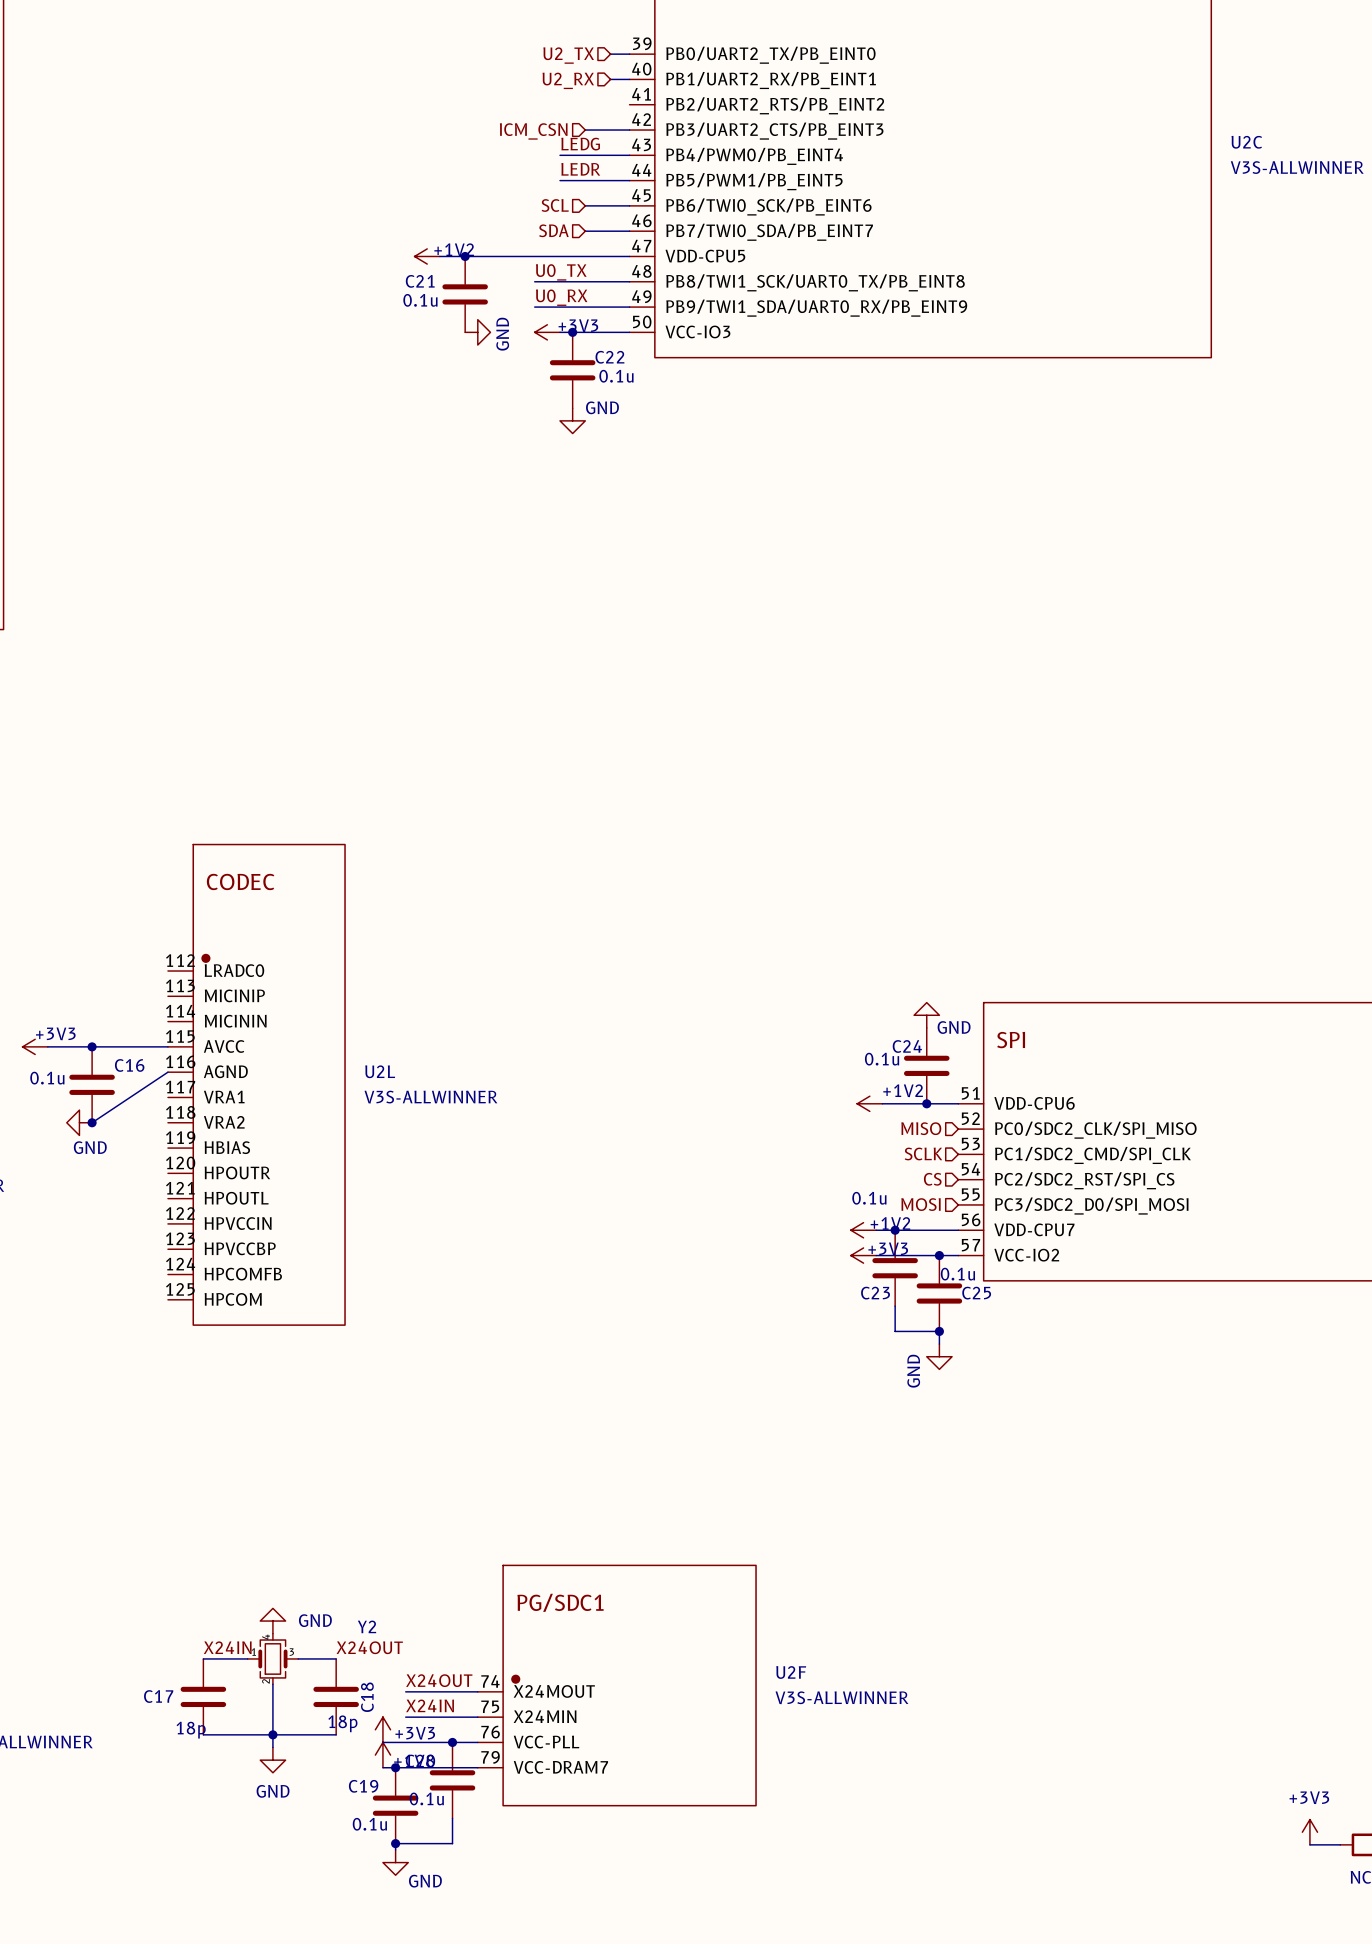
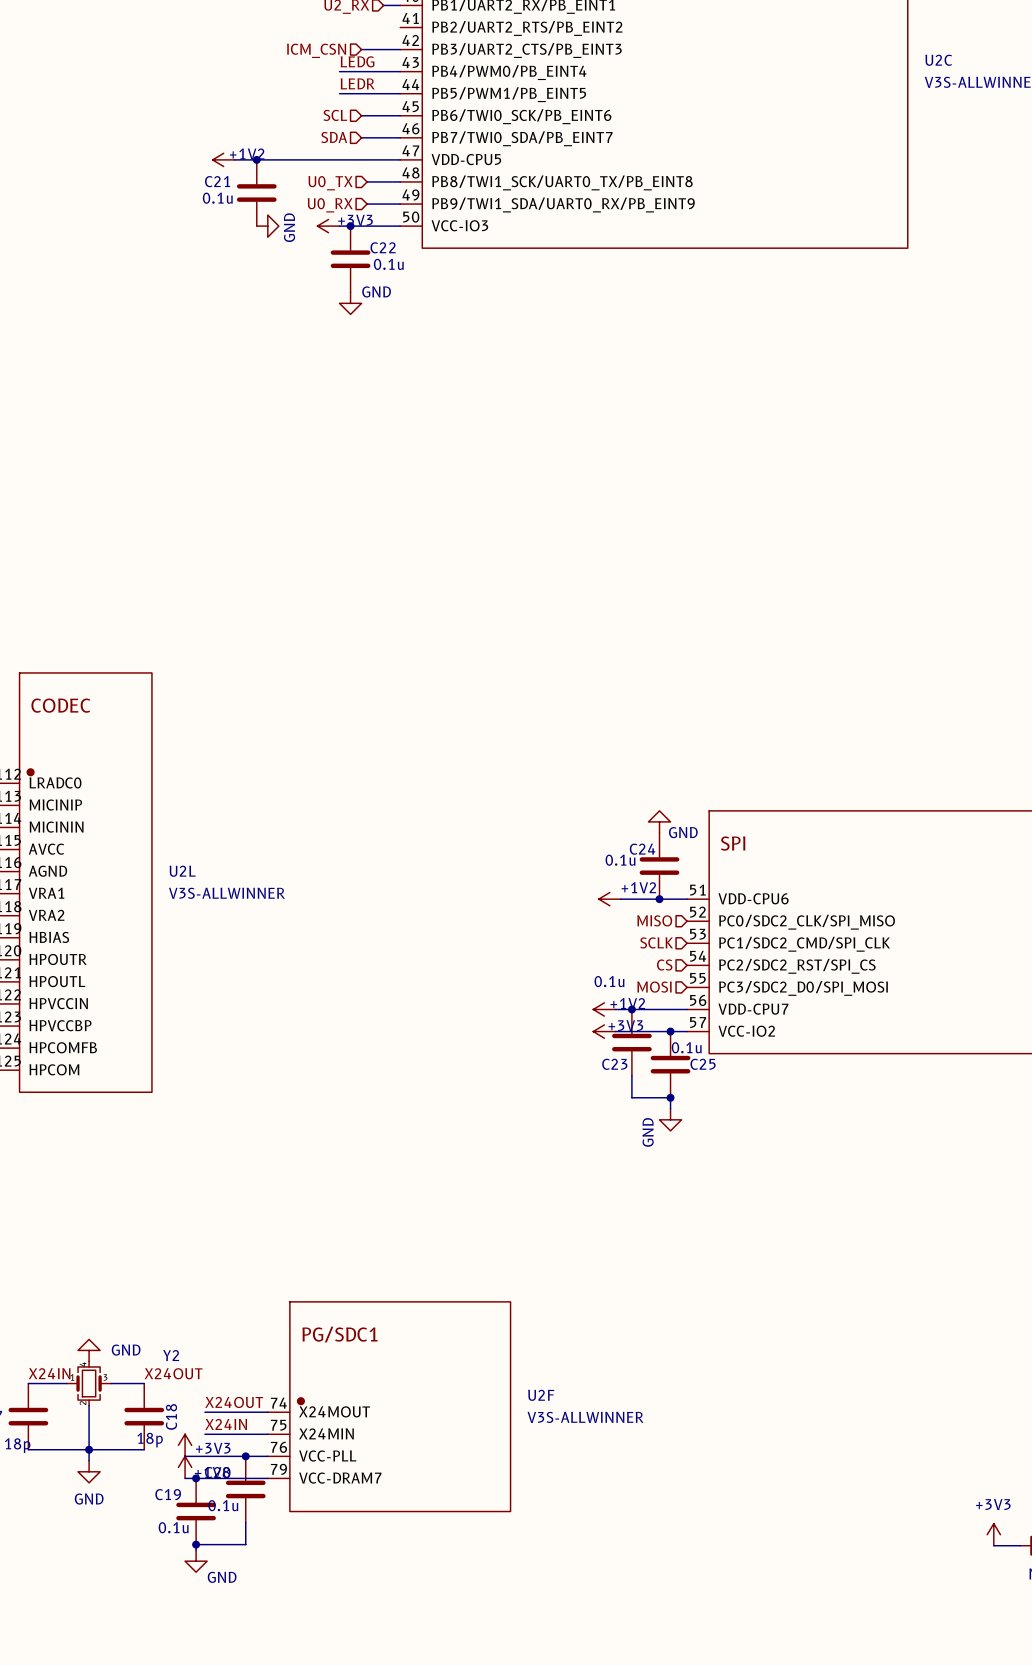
label: U0_TX (561, 272) -> none
wire: (534, 281) (591, 281) -> none
hierarchical label: none -> U0_TX (330, 183)
label: U0_RX (561, 297) -> none
wire: (534, 307) (591, 307) -> none
hierarchical label: none -> U0_RX (330, 205)

